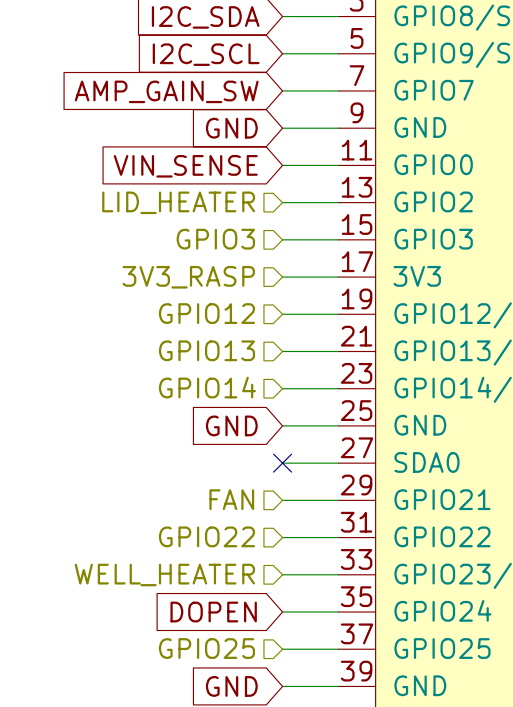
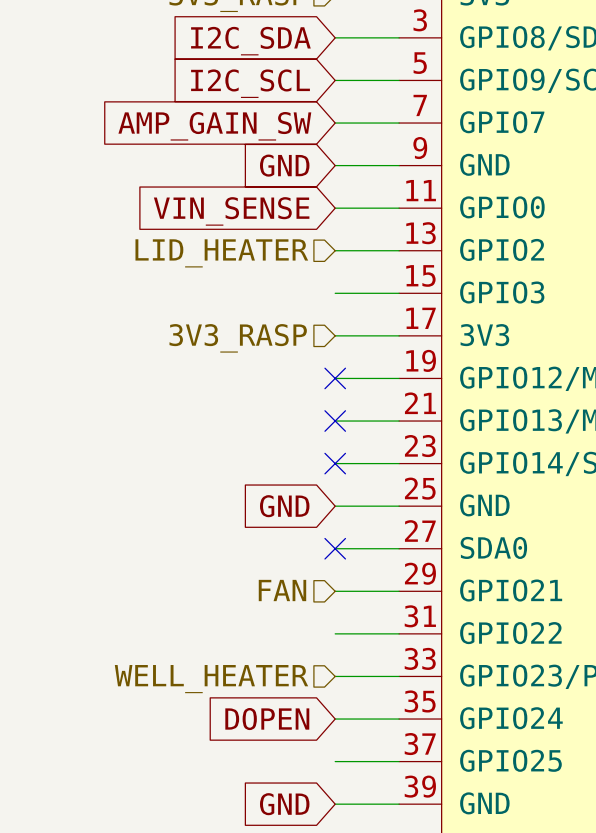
hierarchical label: GPIO3 (215, 239) -> none
hierarchical label: GPIO12 (206, 313) -> none
no-connect mark: none -> (335, 378)
hierarchical label: GPIO13 (206, 350) -> none
no-connect mark: none -> (335, 421)
hierarchical label: GPIO14 (207, 387) -> none
no-connect mark: none -> (335, 463)
hierarchical label: GPIO22 (206, 536) -> none
hierarchical label: GPIO25 (206, 648) -> none

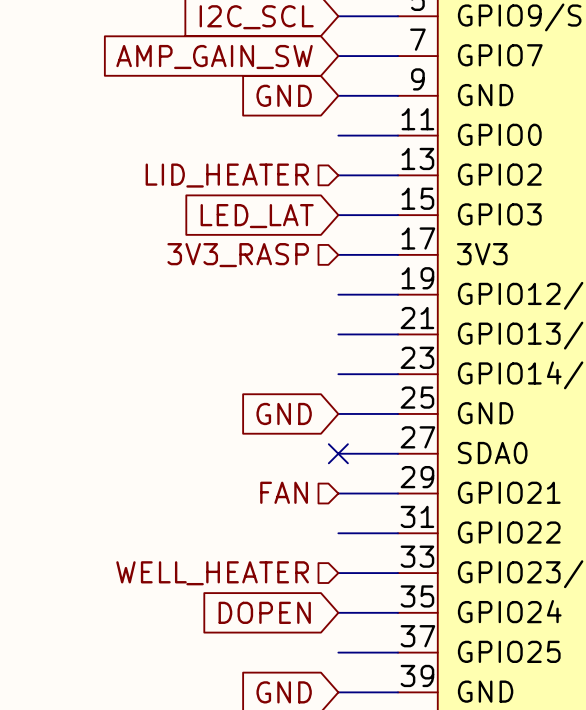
global label: VIN_SENSE (231, 211) -> none
global label: none -> LED_LAT (257, 216)
no-connect mark: (335, 378) -> none
no-connect mark: (335, 421) -> none
no-connect mark: (335, 463) -> none

